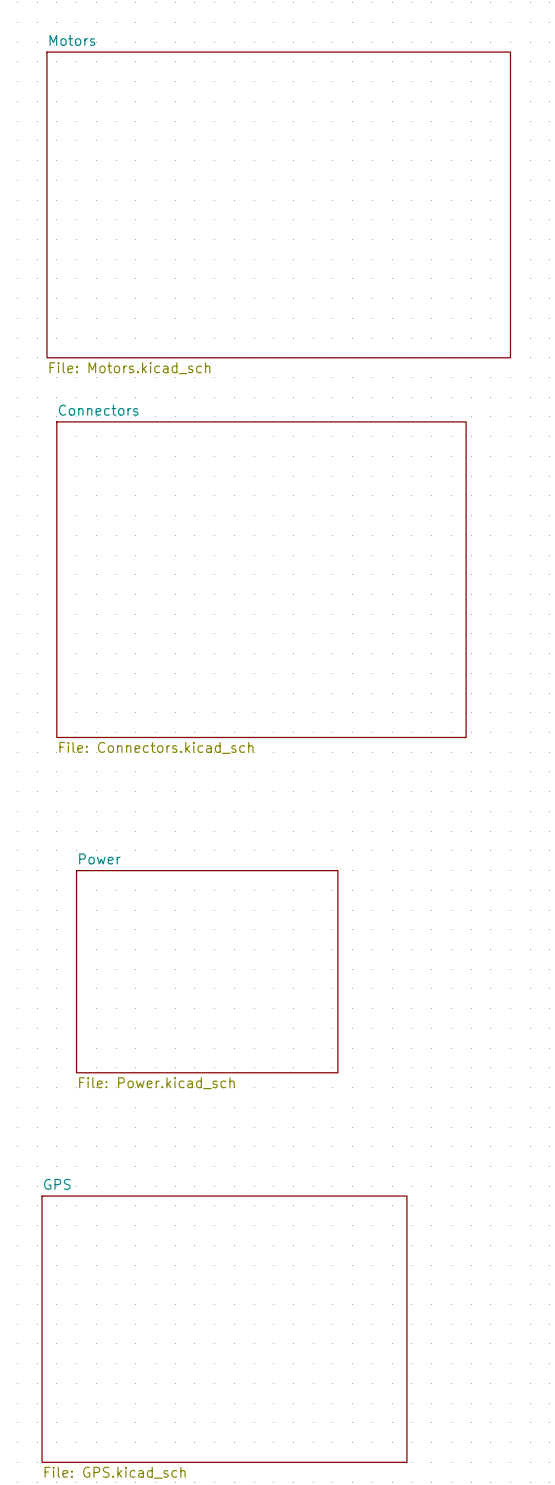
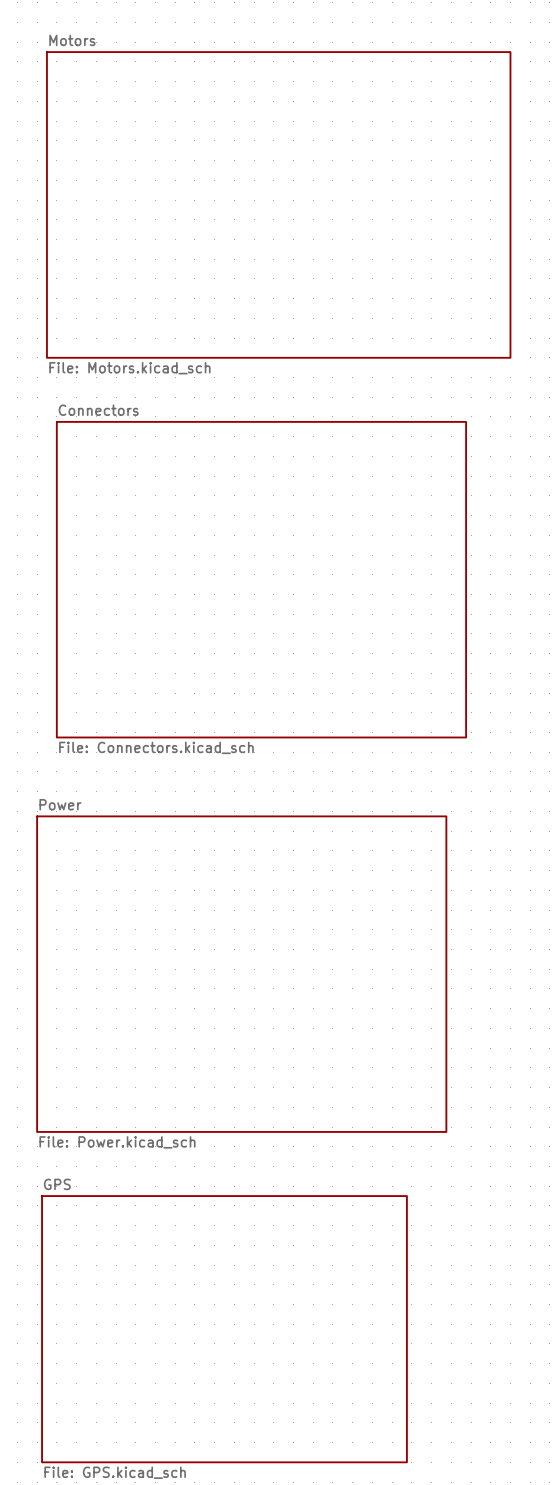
sheet Power: File: Power.kicad_sch (207, 971) -> none
sheet Power: none -> File: Power.kicad_sch (241, 974)

